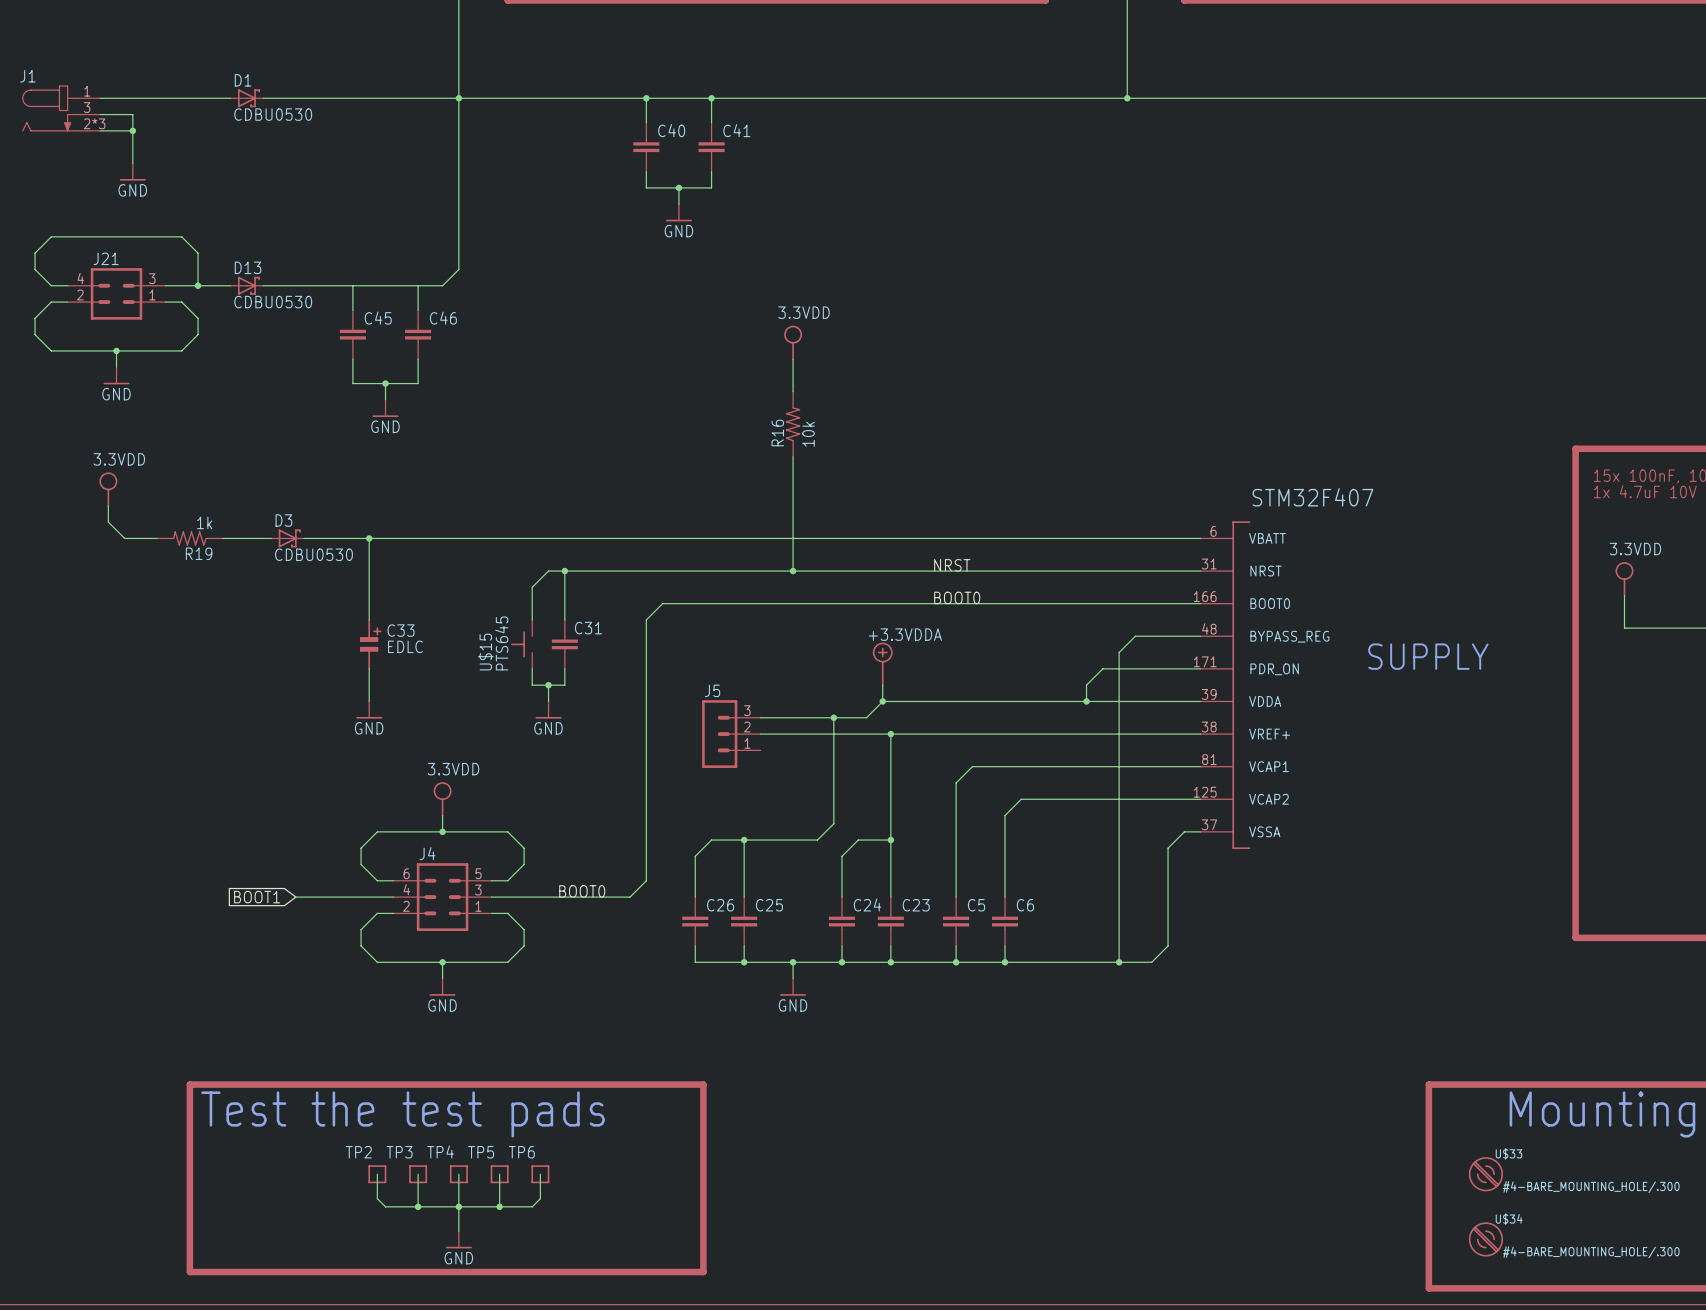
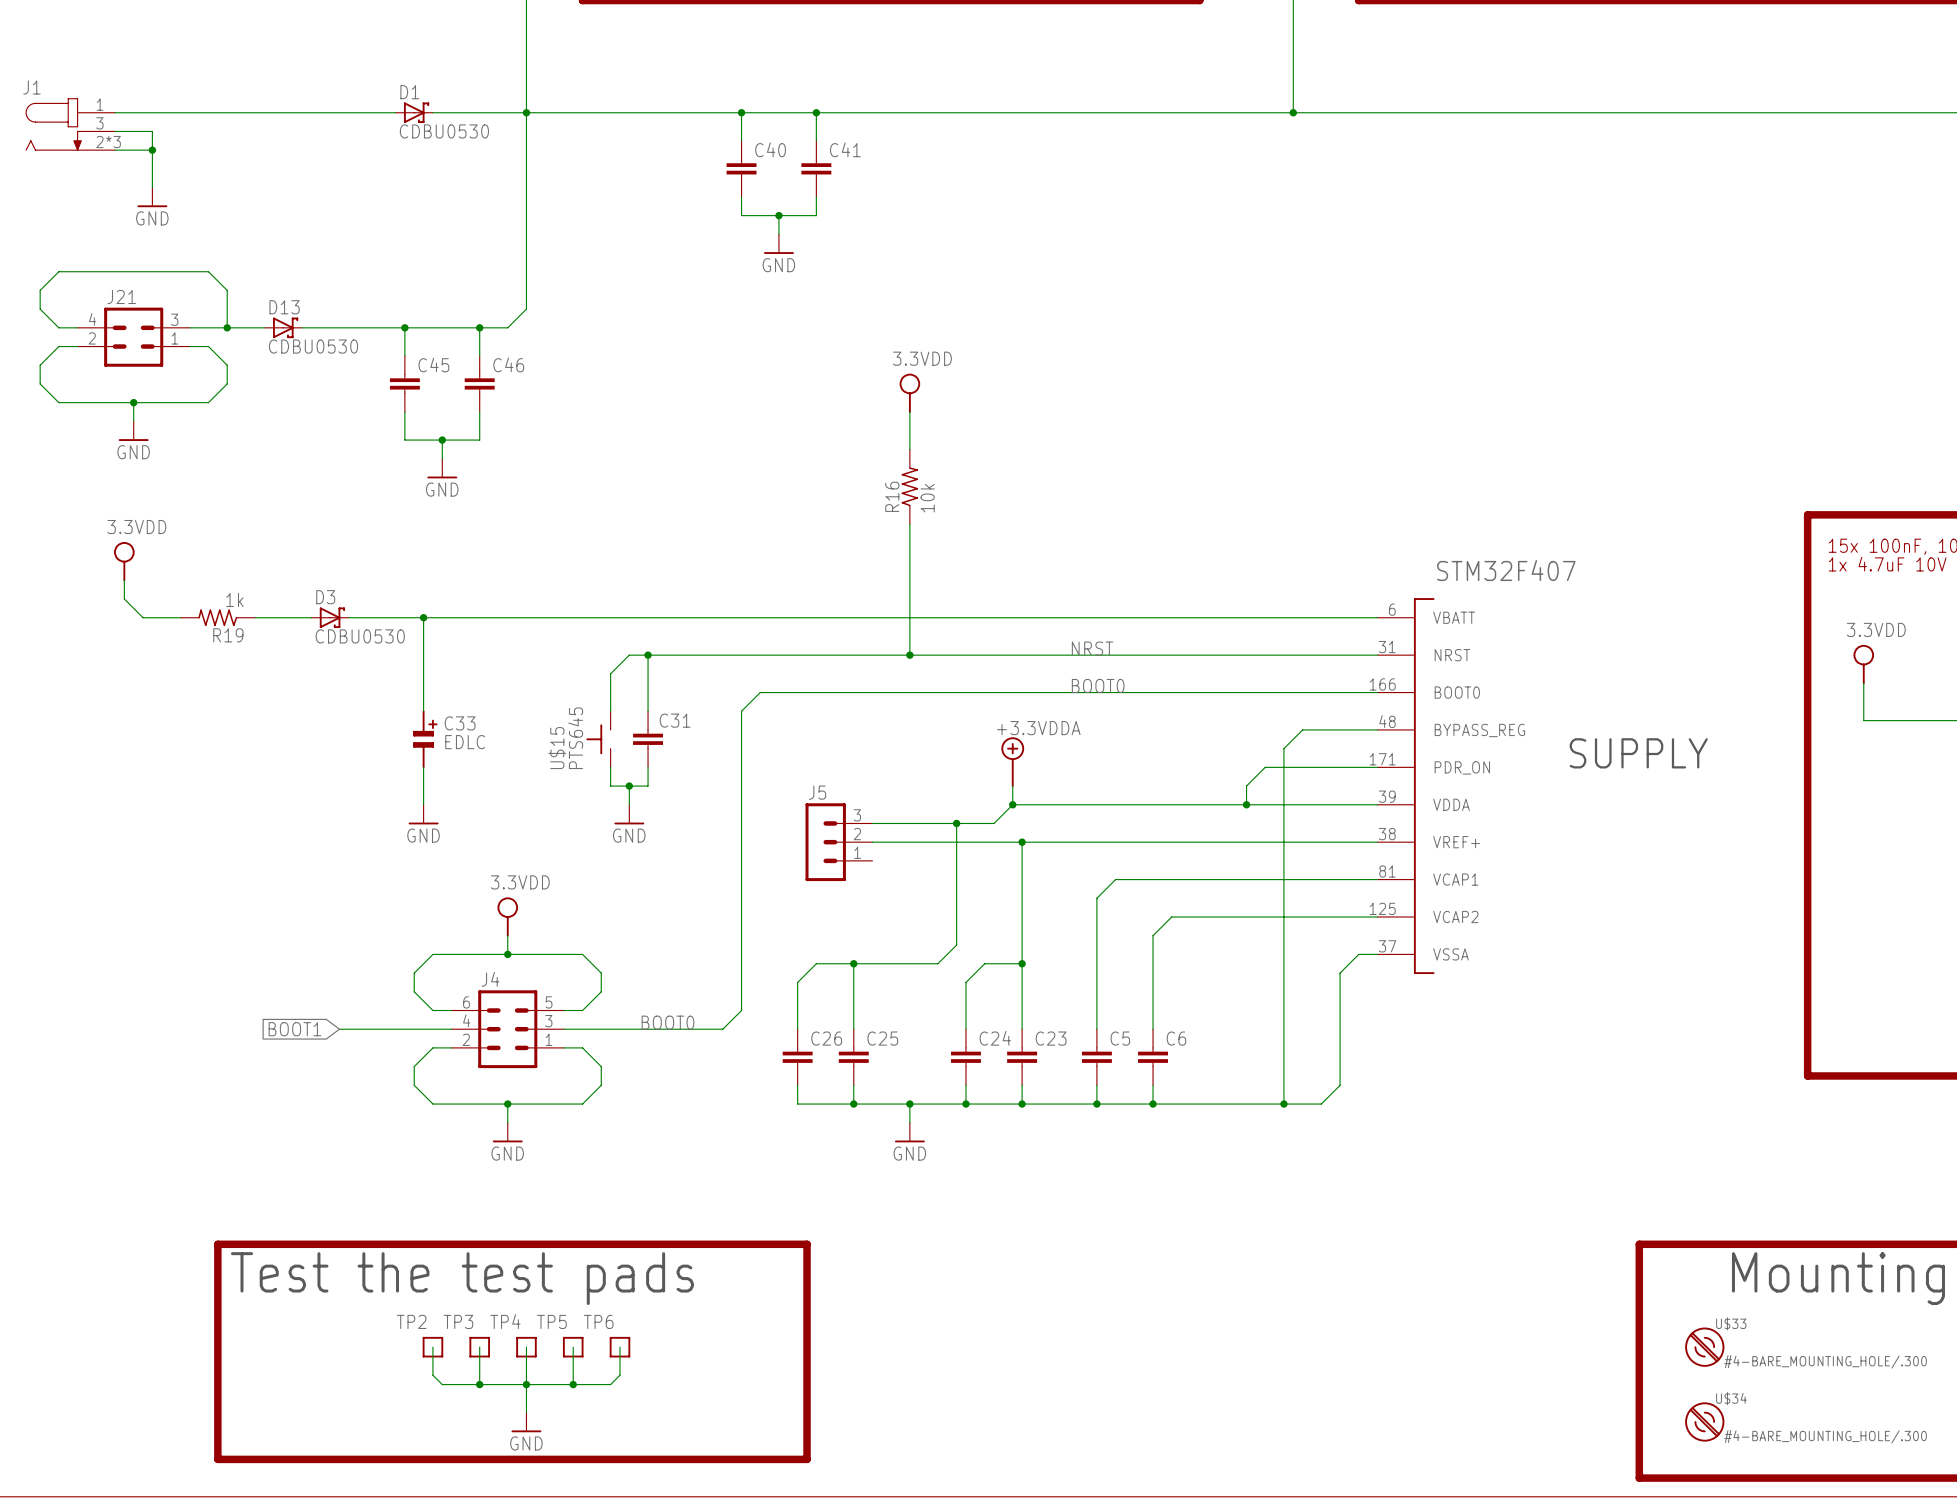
D1 position: (246, 98) -> (414, 112)
junction: none -> (404, 327)
junction: none -> (479, 327)

